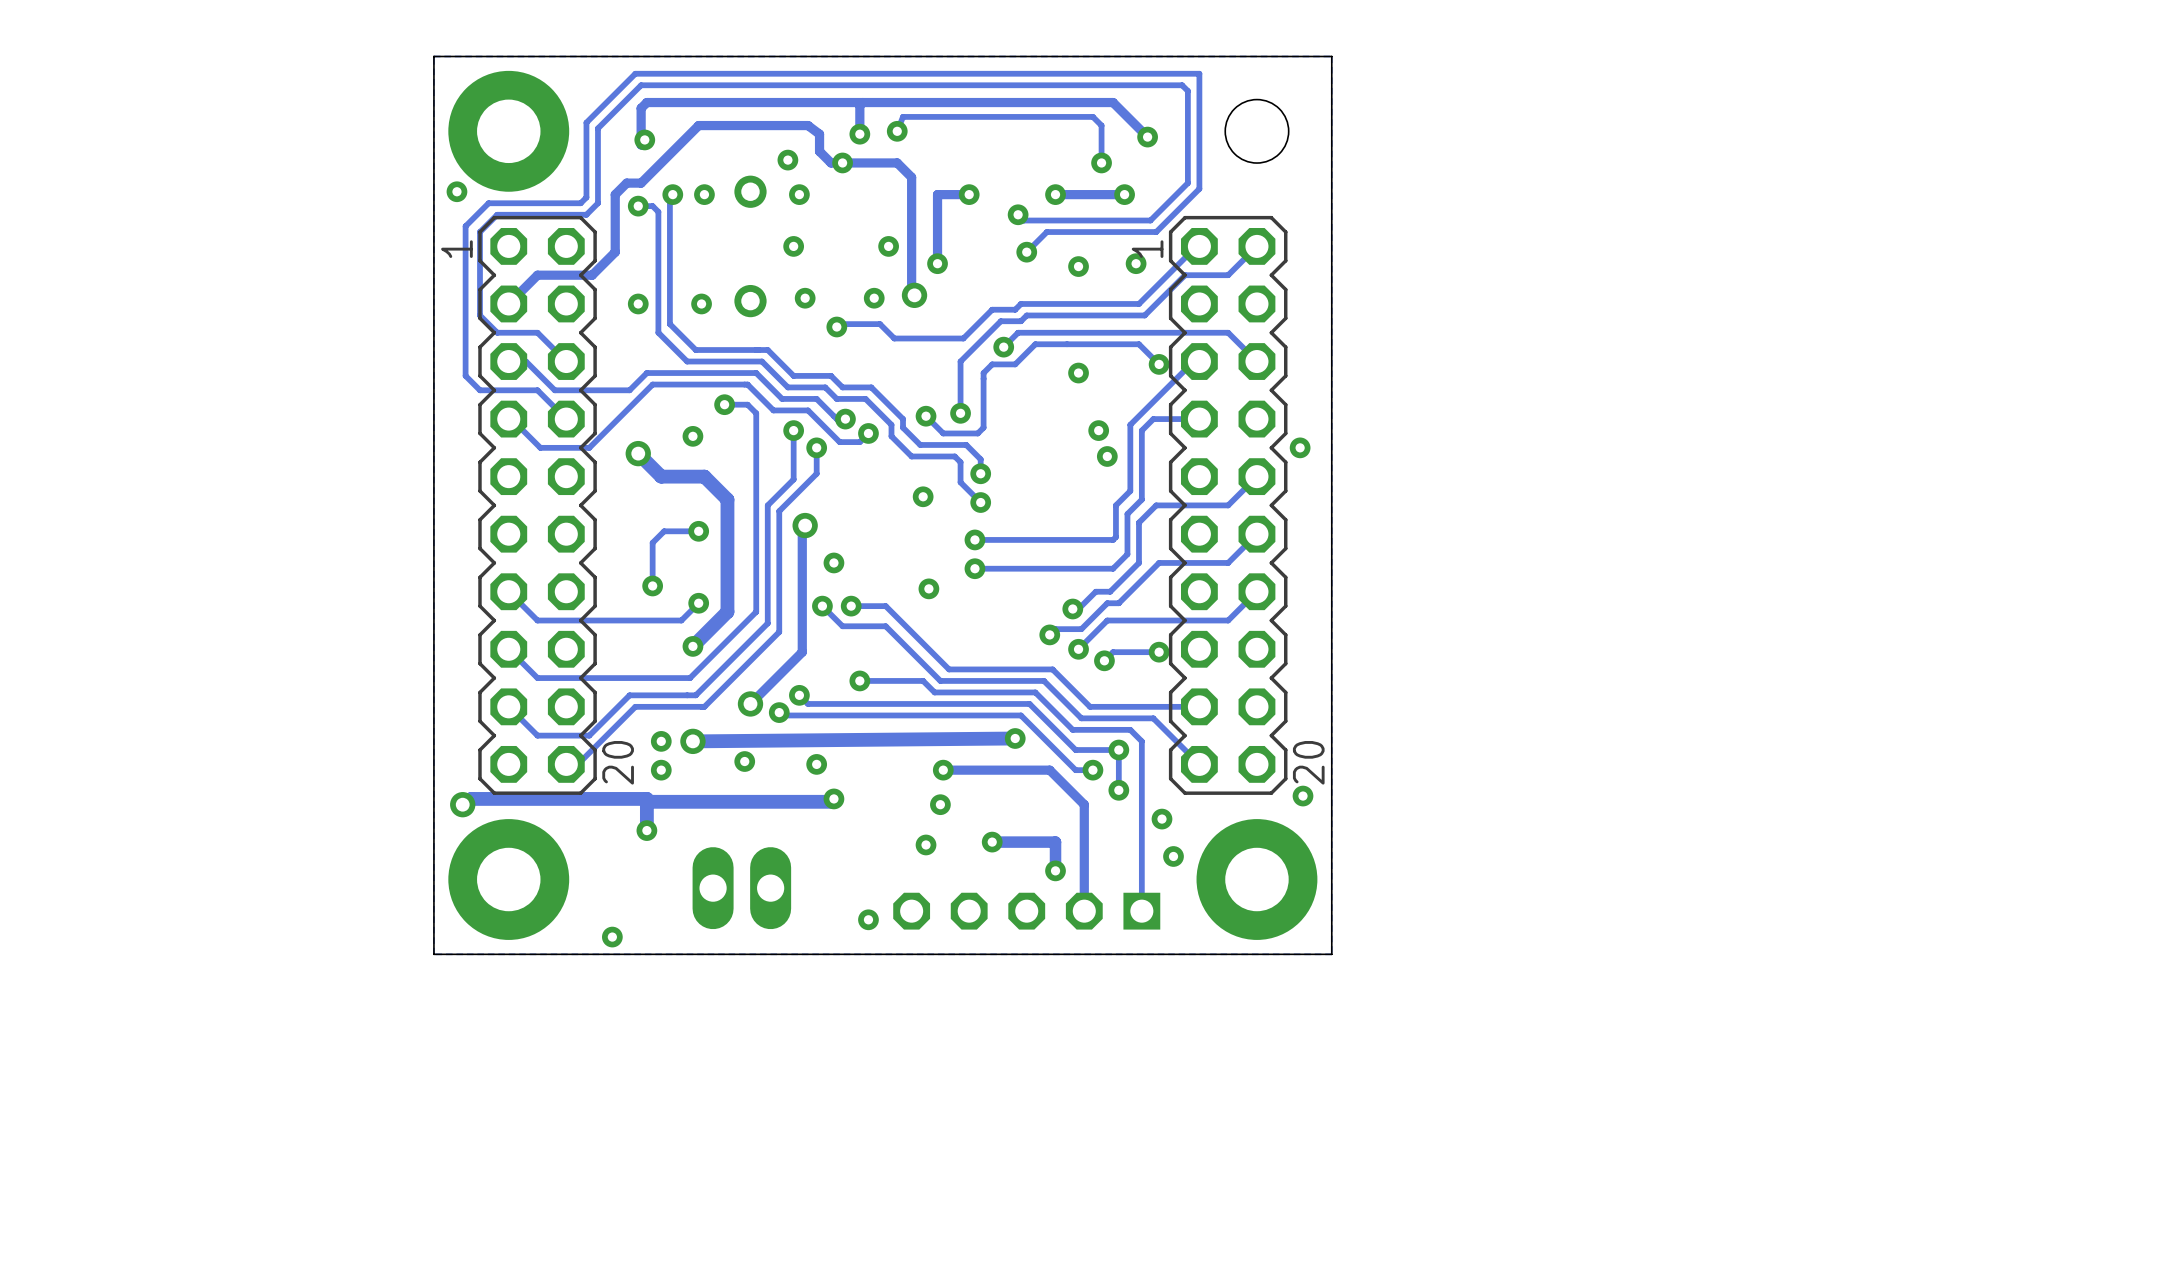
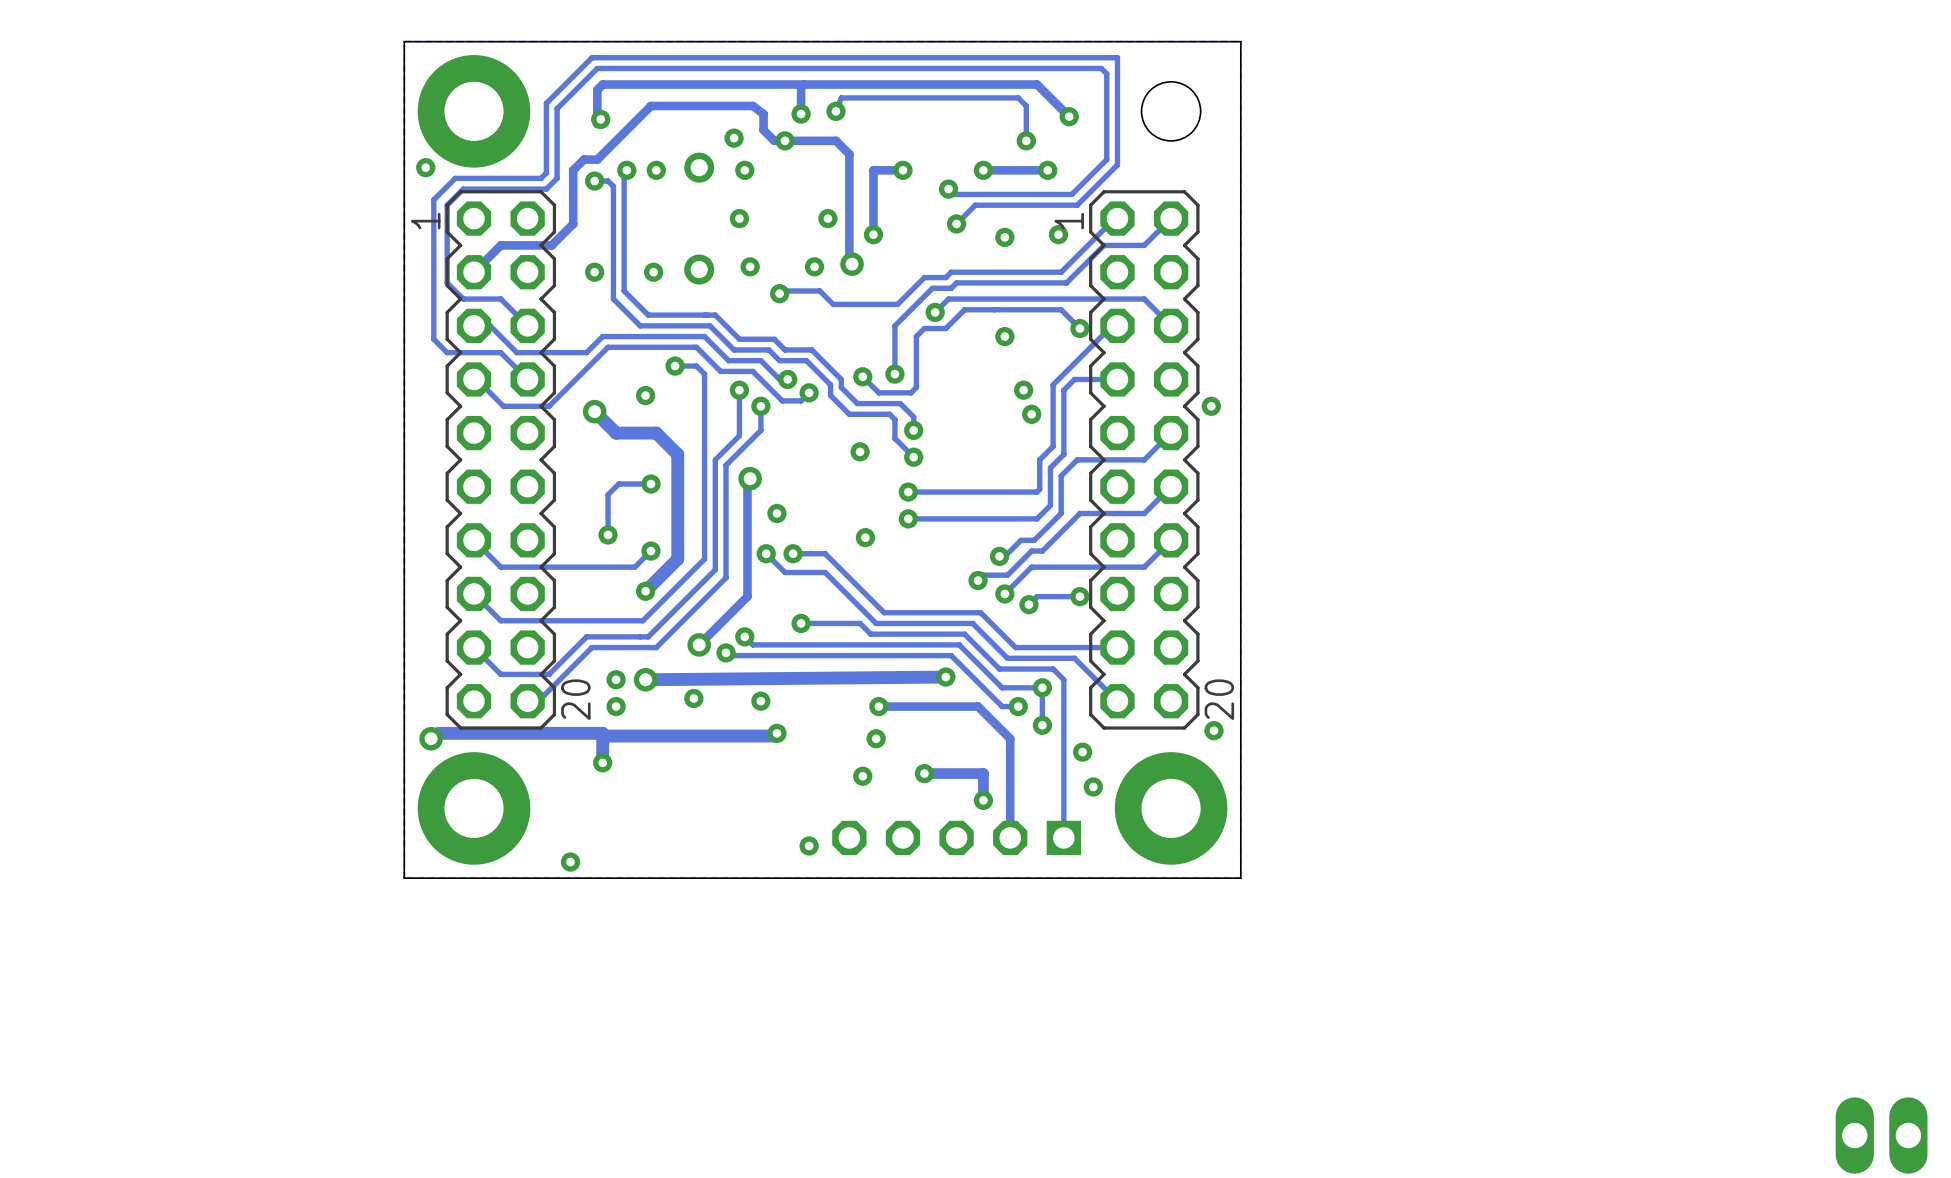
part: (741, 888) -> none
part: none -> (1881, 1135)

